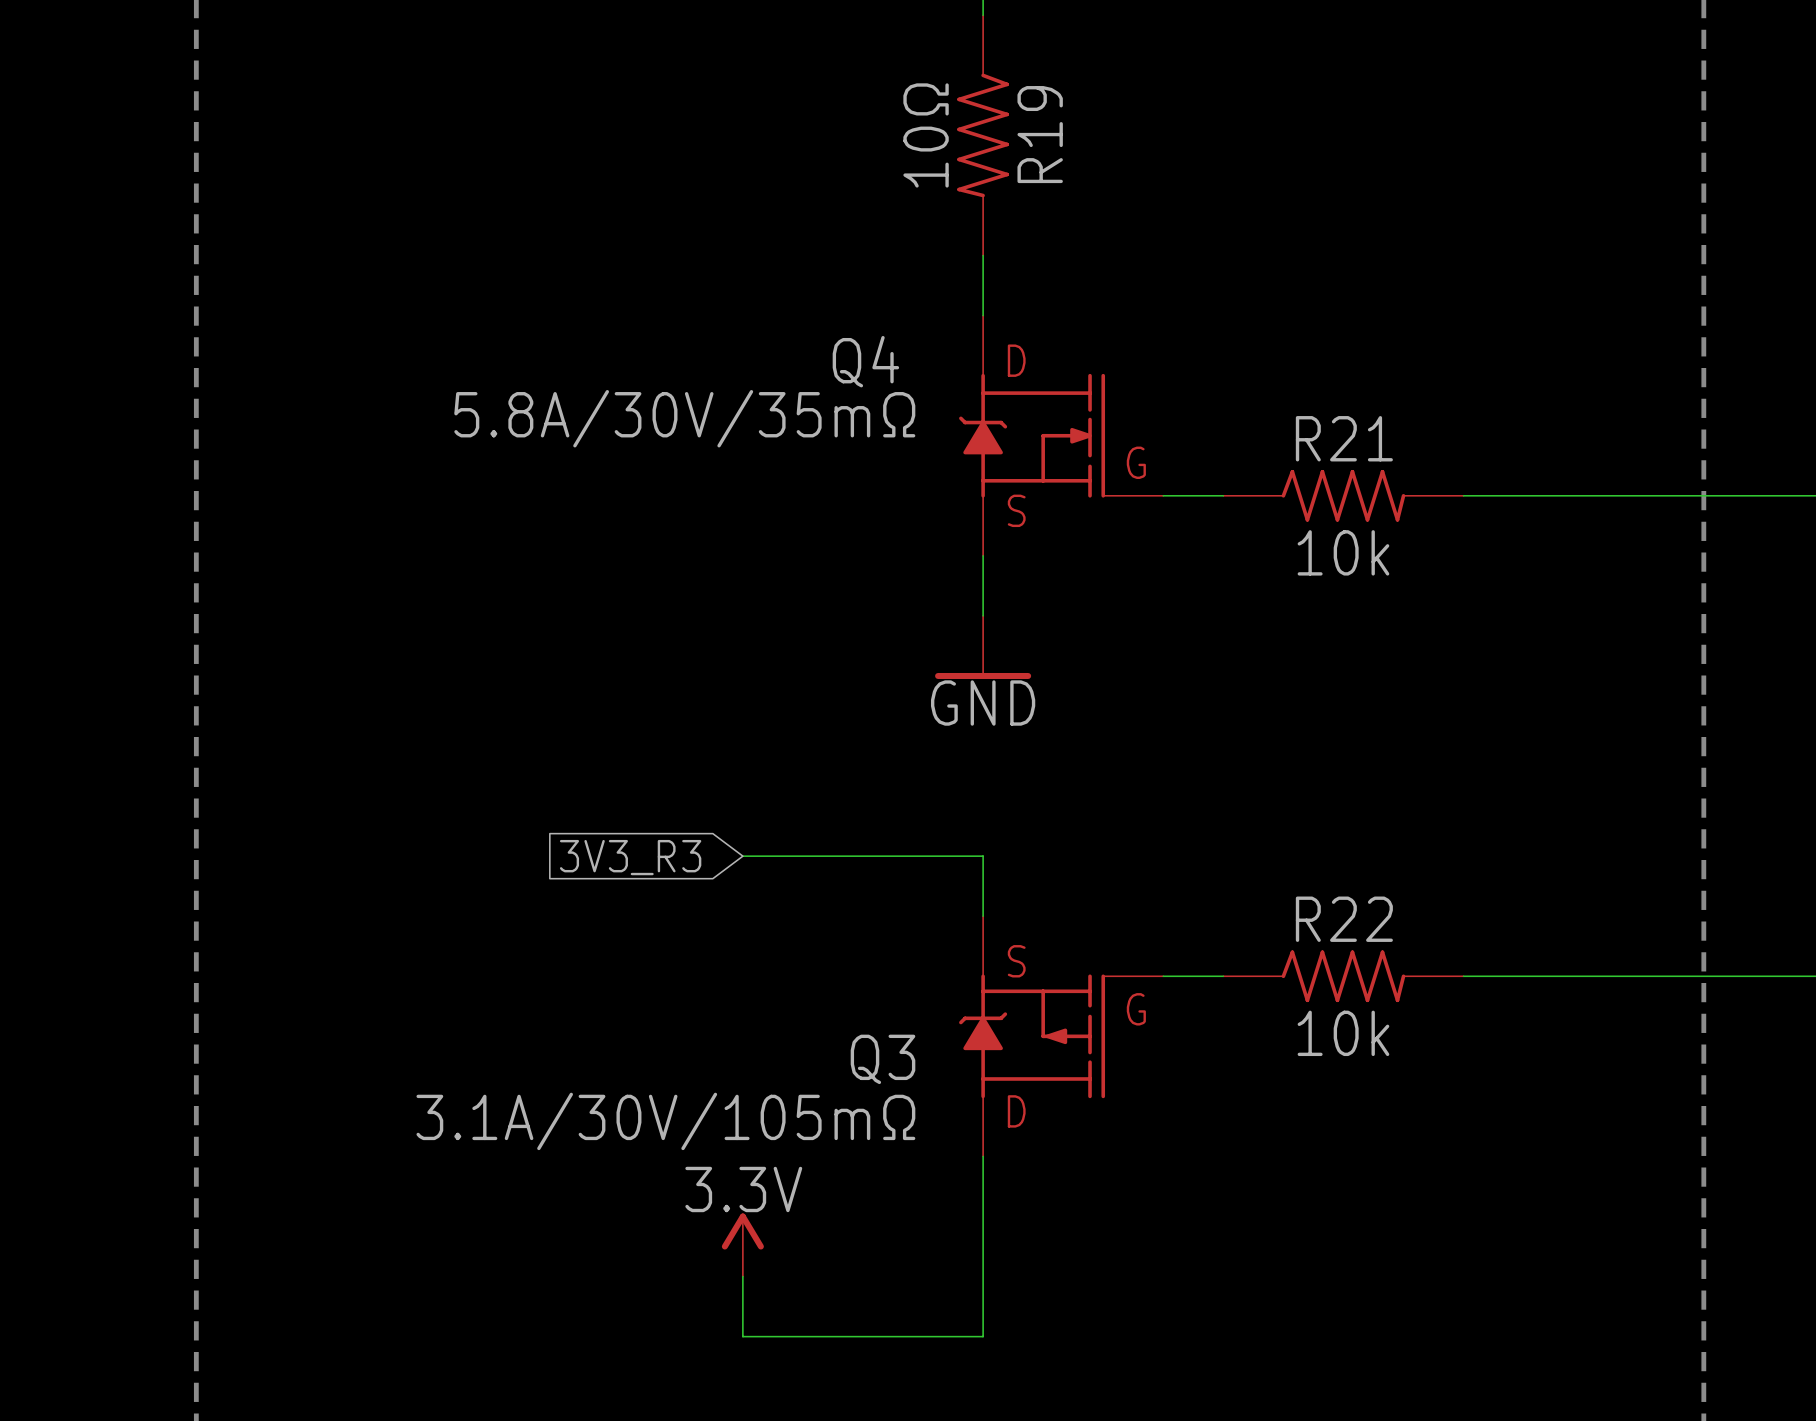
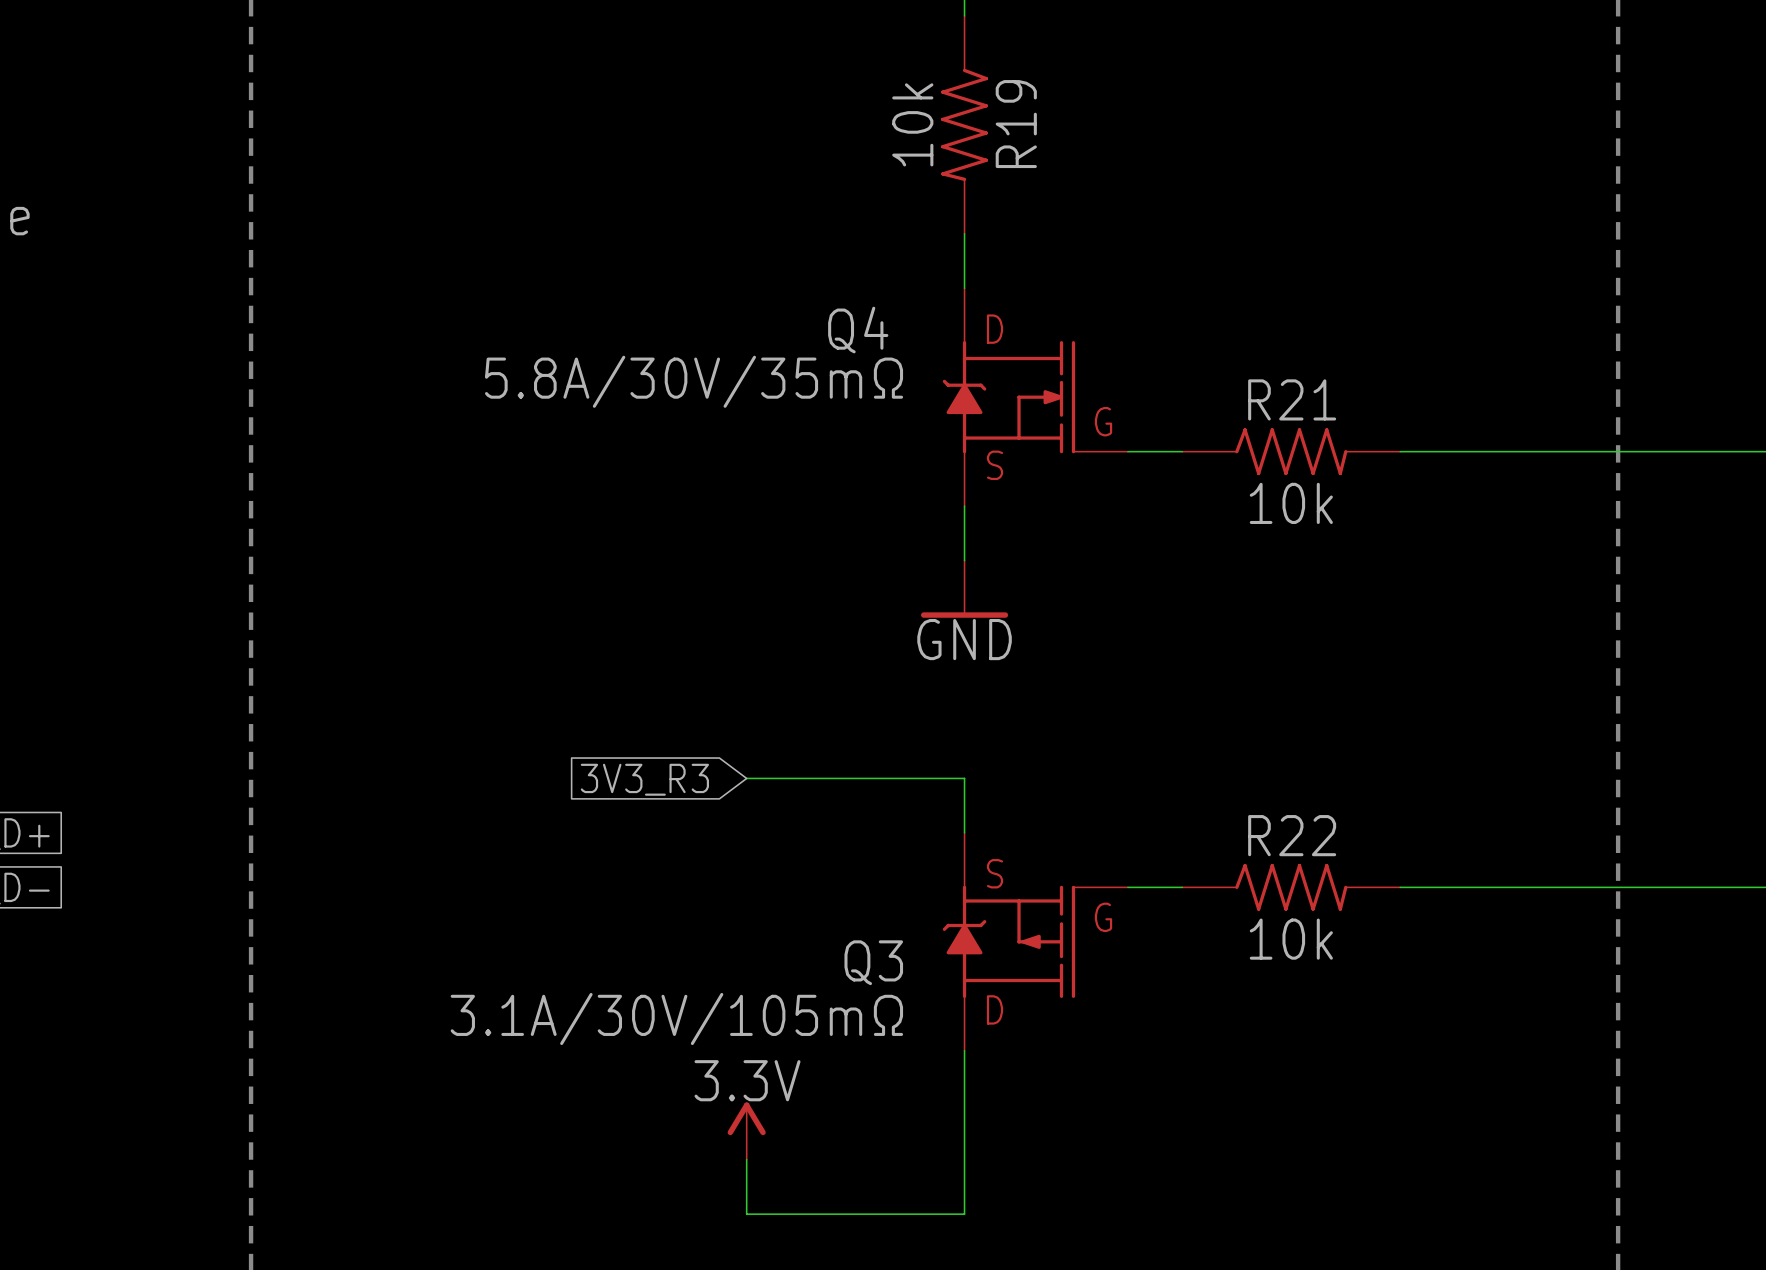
R19 value: 10Ω (926, 135) -> 10k (912, 124)

